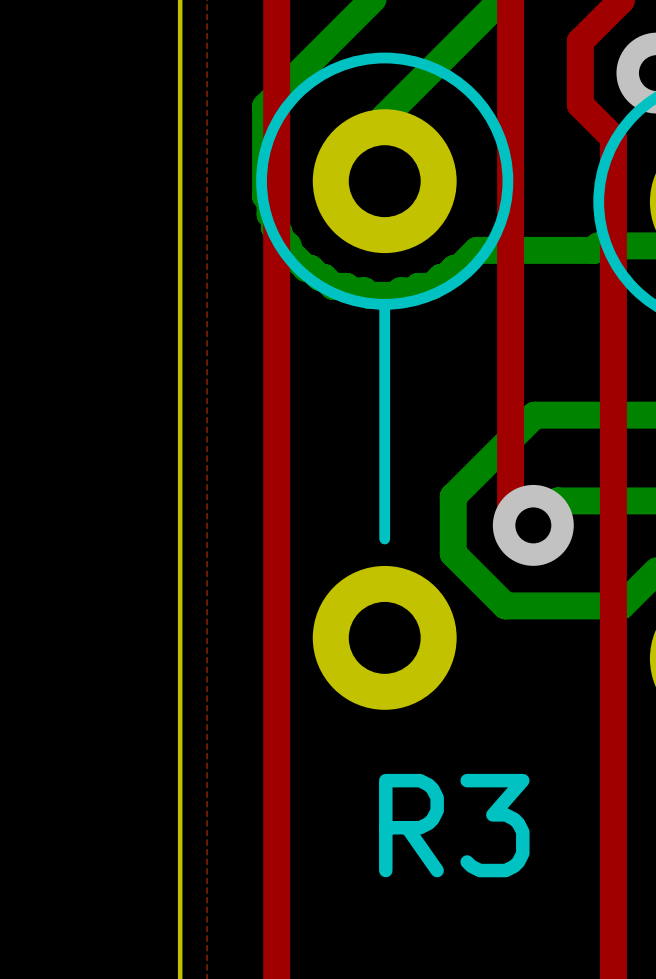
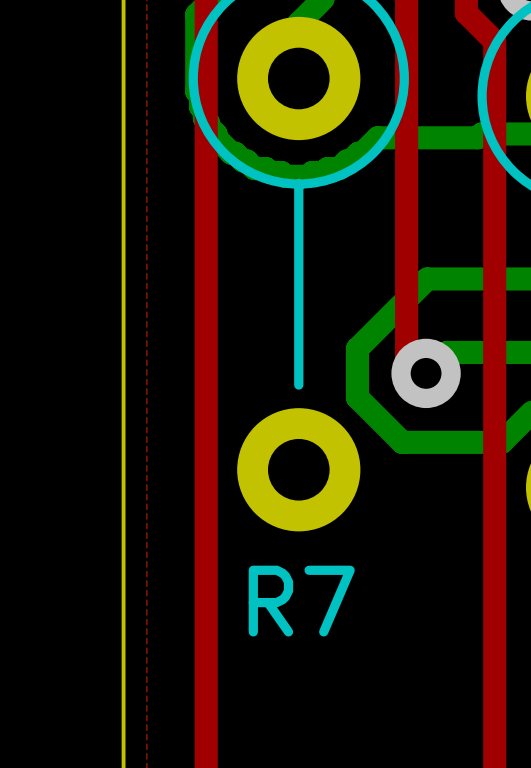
R7 name: none -> R7 (301, 601)
R3 name: R3 (454, 825) -> none

